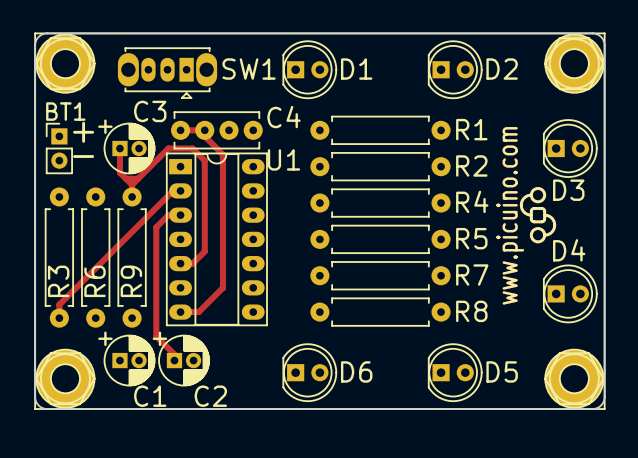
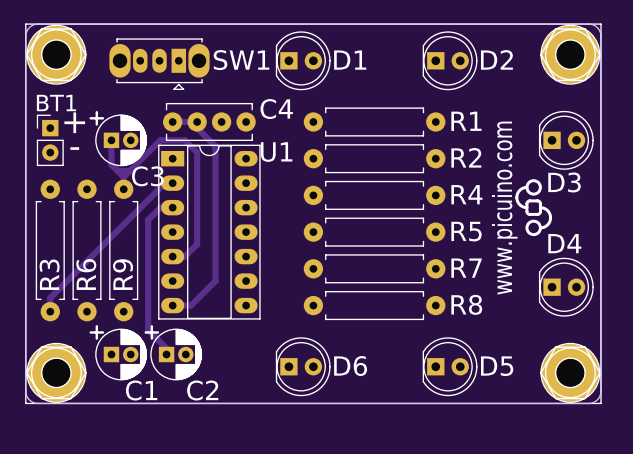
C3 name position: C3 (150, 111) -> C3 (147, 176)

